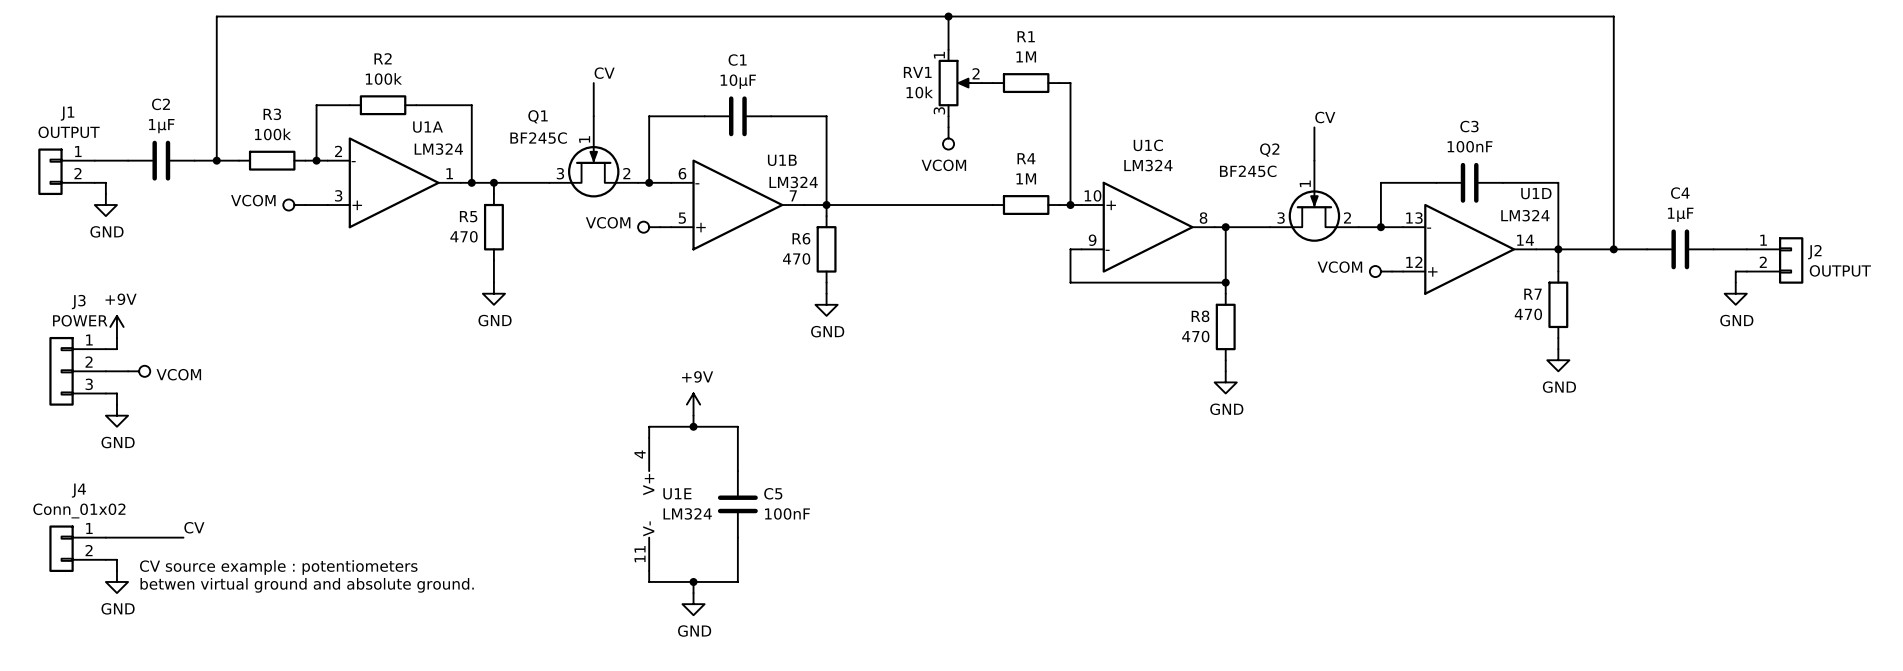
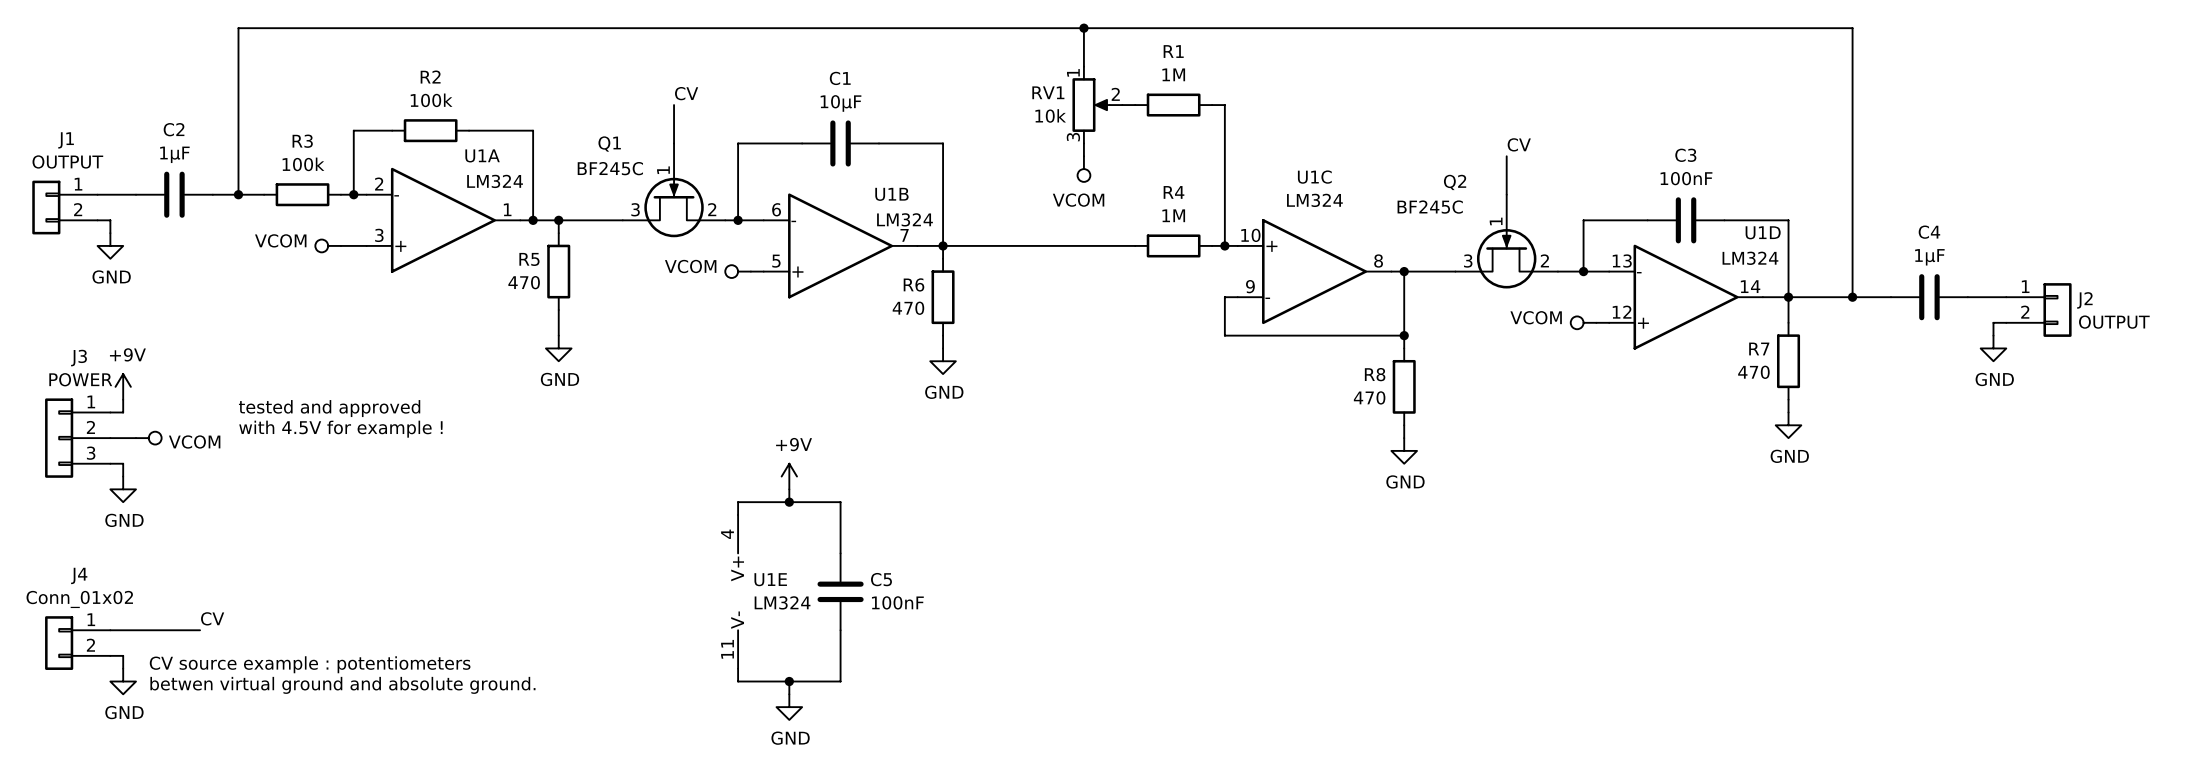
text: none -> tested and approved (329, 408)
text: none -> with 4.5V for example ! (340, 429)

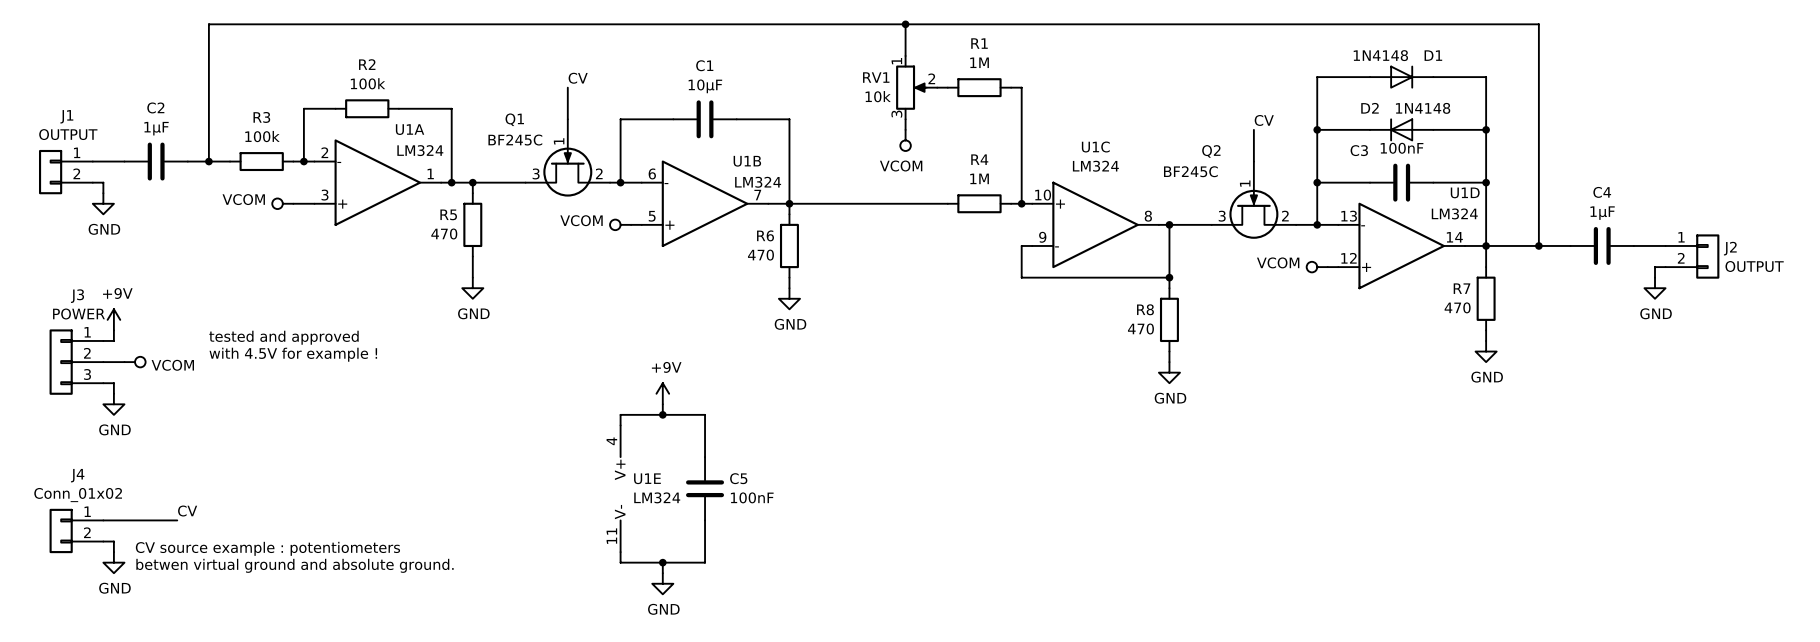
wire: none -> (1370, 77) (1317, 77) (1317, 182)
D1: none -> 1N4148 (1401, 77)
wire: none -> (1433, 77) (1486, 77) (1486, 182)
C3 name position: C3 (1685, 155) -> C3 (1359, 150)
wire: none -> (1317, 129) (1370, 129)
junction: none -> (1317, 129)
D2: none -> 1N4148 (1401, 129)
wire: none -> (1433, 129) (1486, 129)
junction: none -> (1486, 129)
junction: none -> (1317, 182)
junction: none -> (1486, 182)

